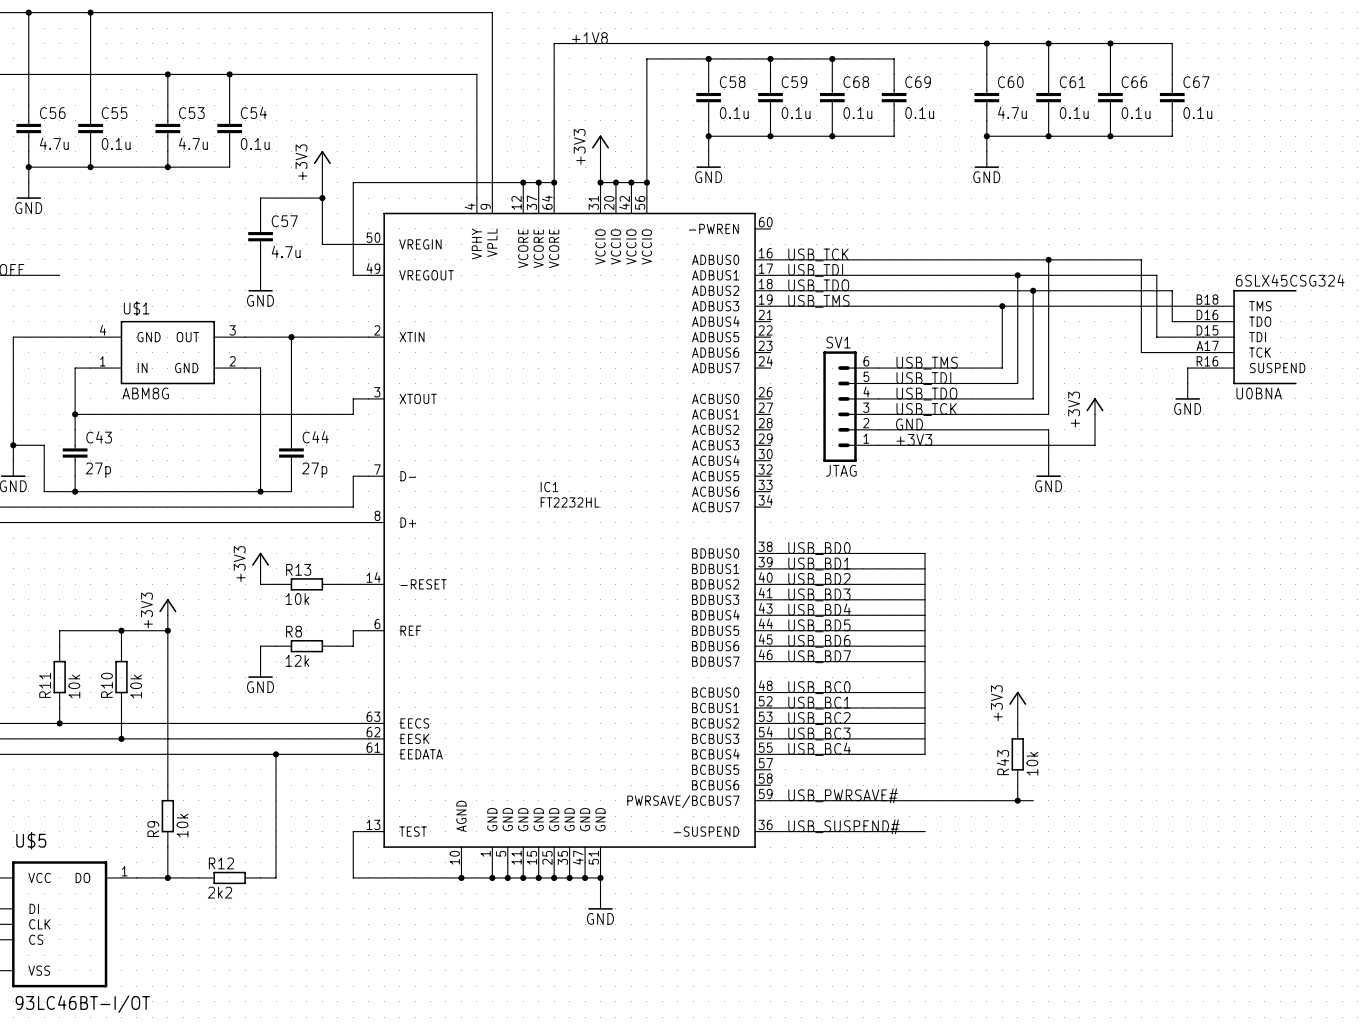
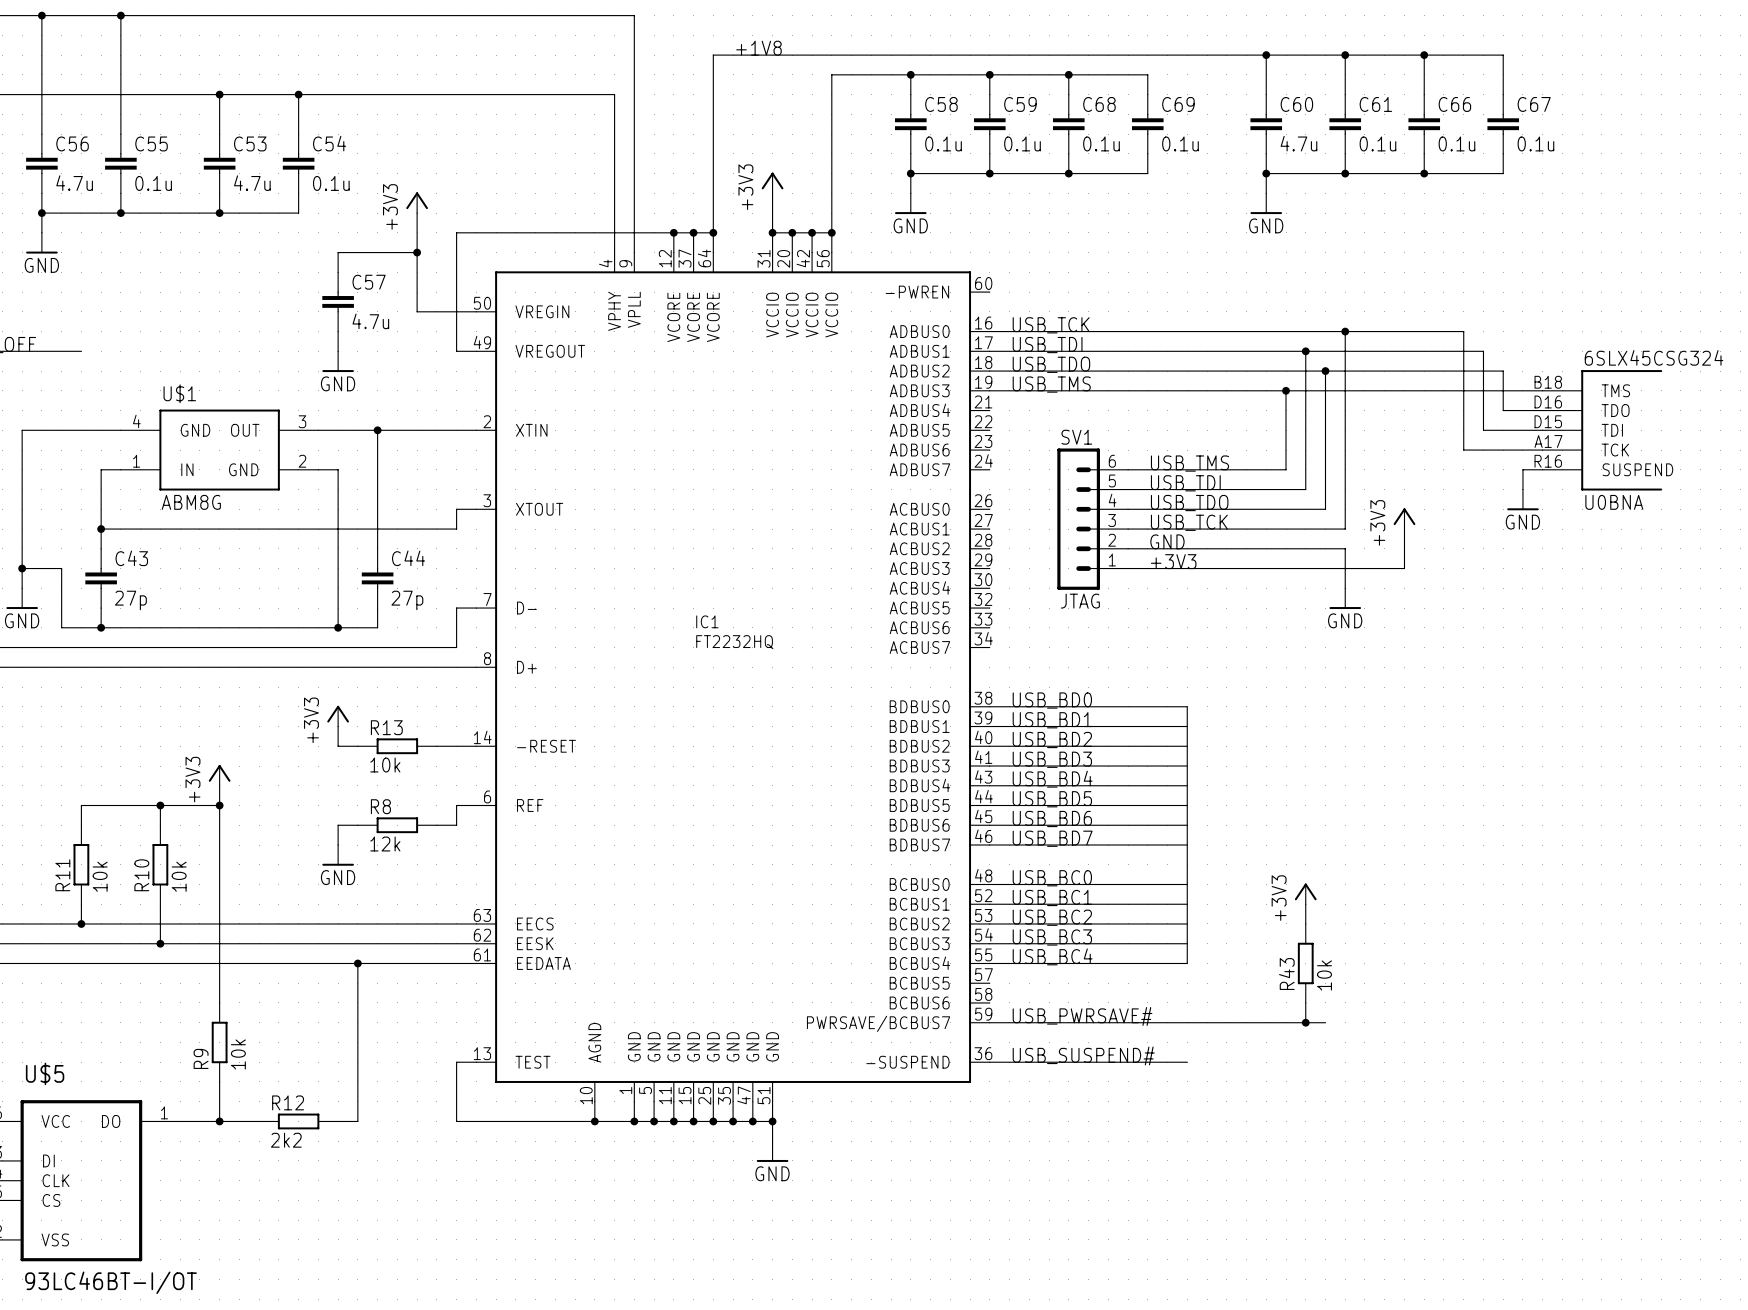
IC1 value: FT2232HL (570, 502) -> FT2232HQ (734, 642)

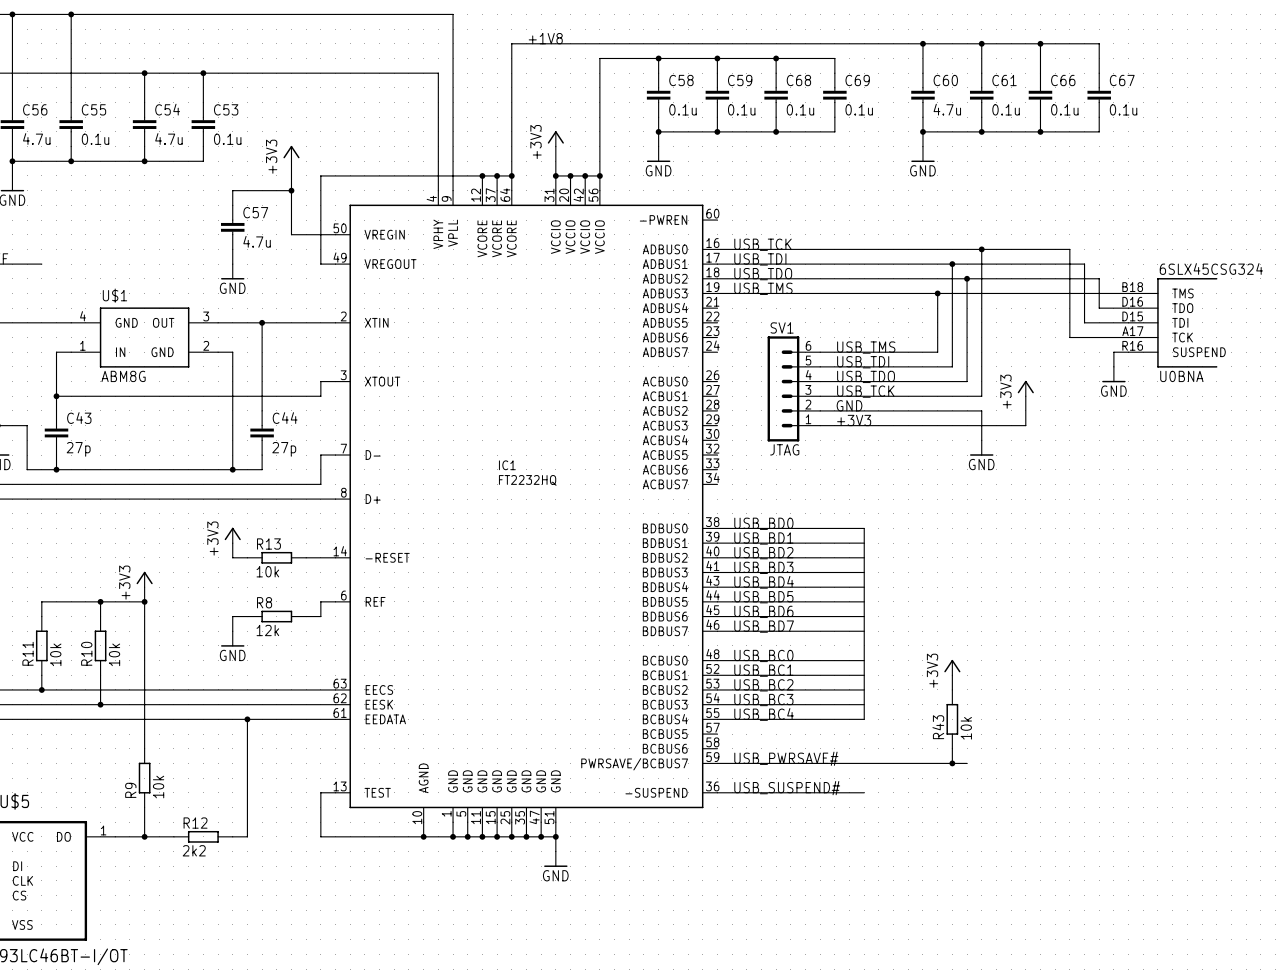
C53 name: C53 (250, 143) -> C54 (167, 109)
C54 name: C54 (329, 143) -> C53 (226, 109)

